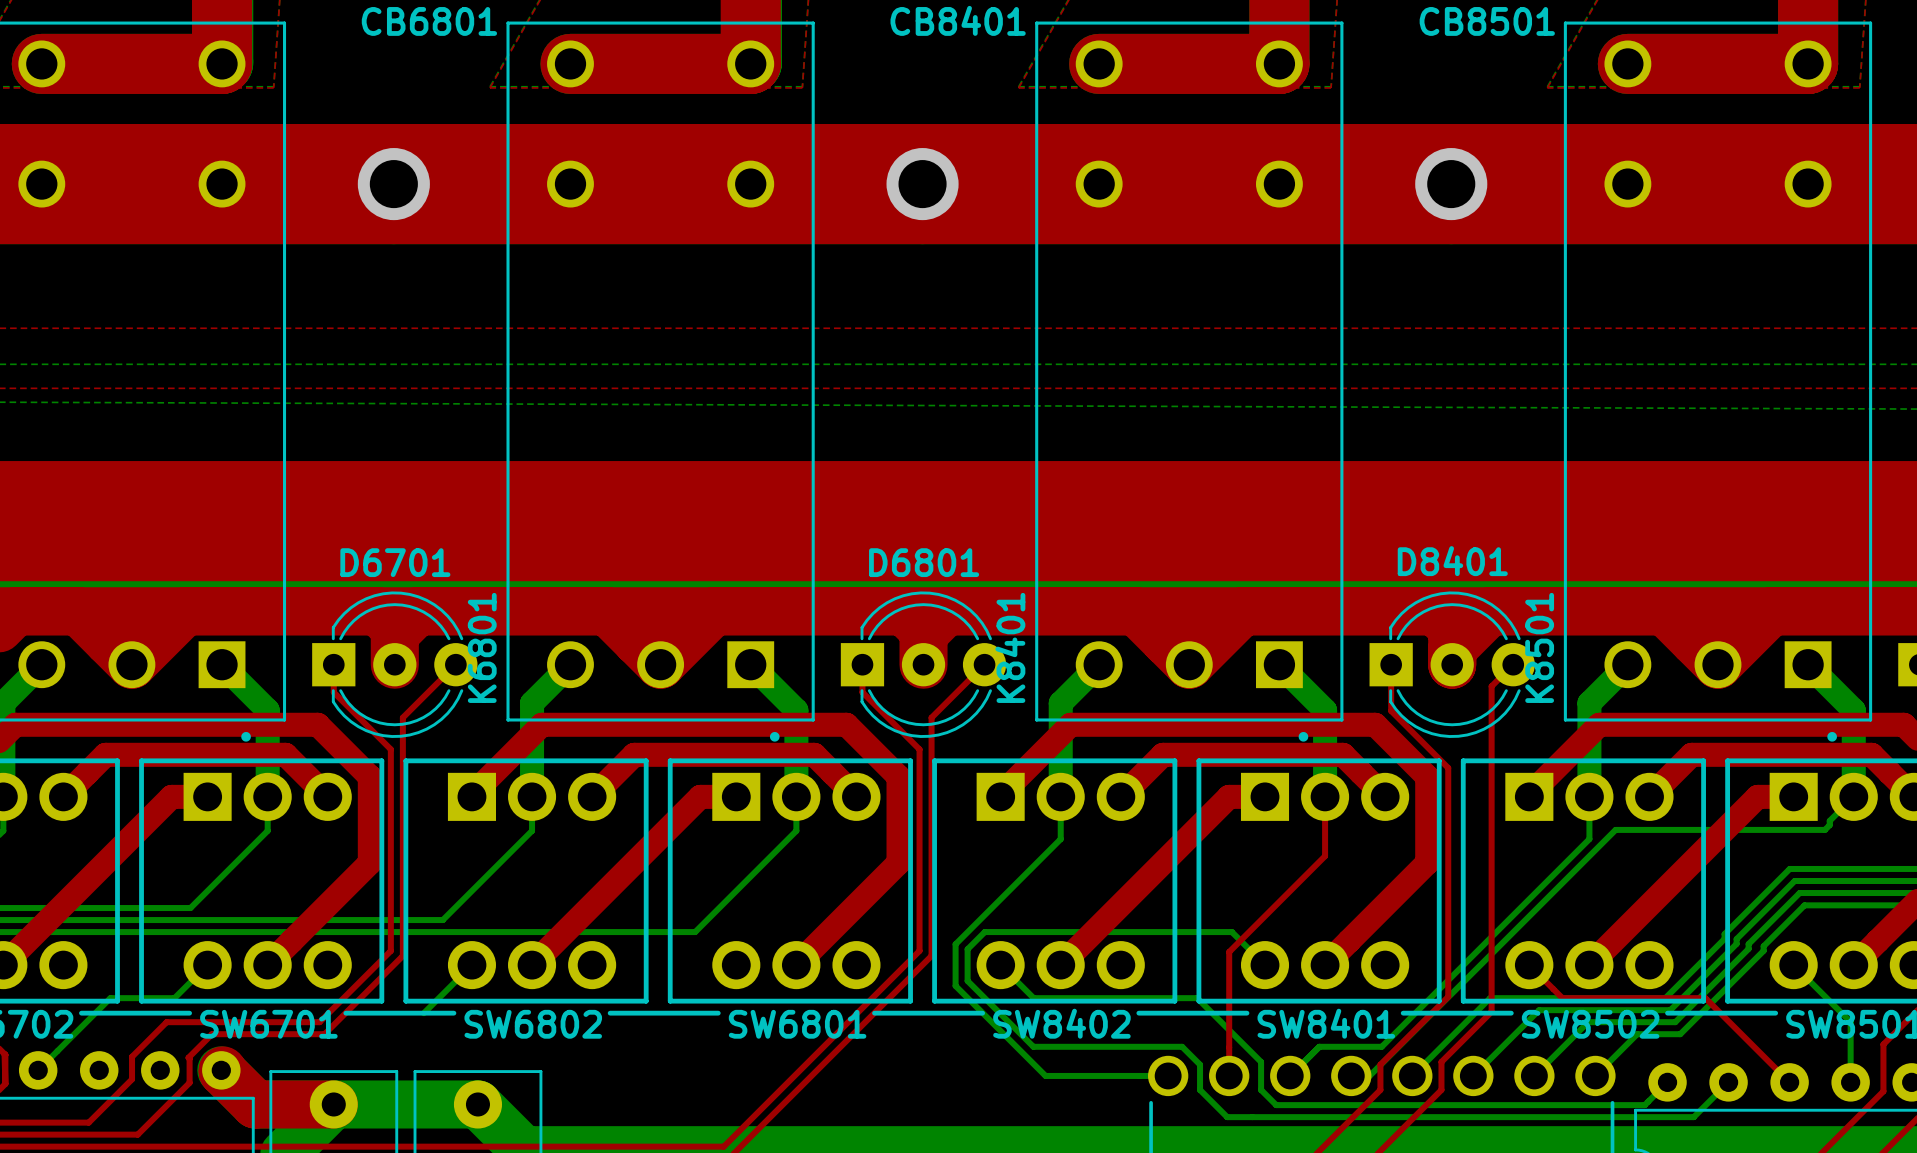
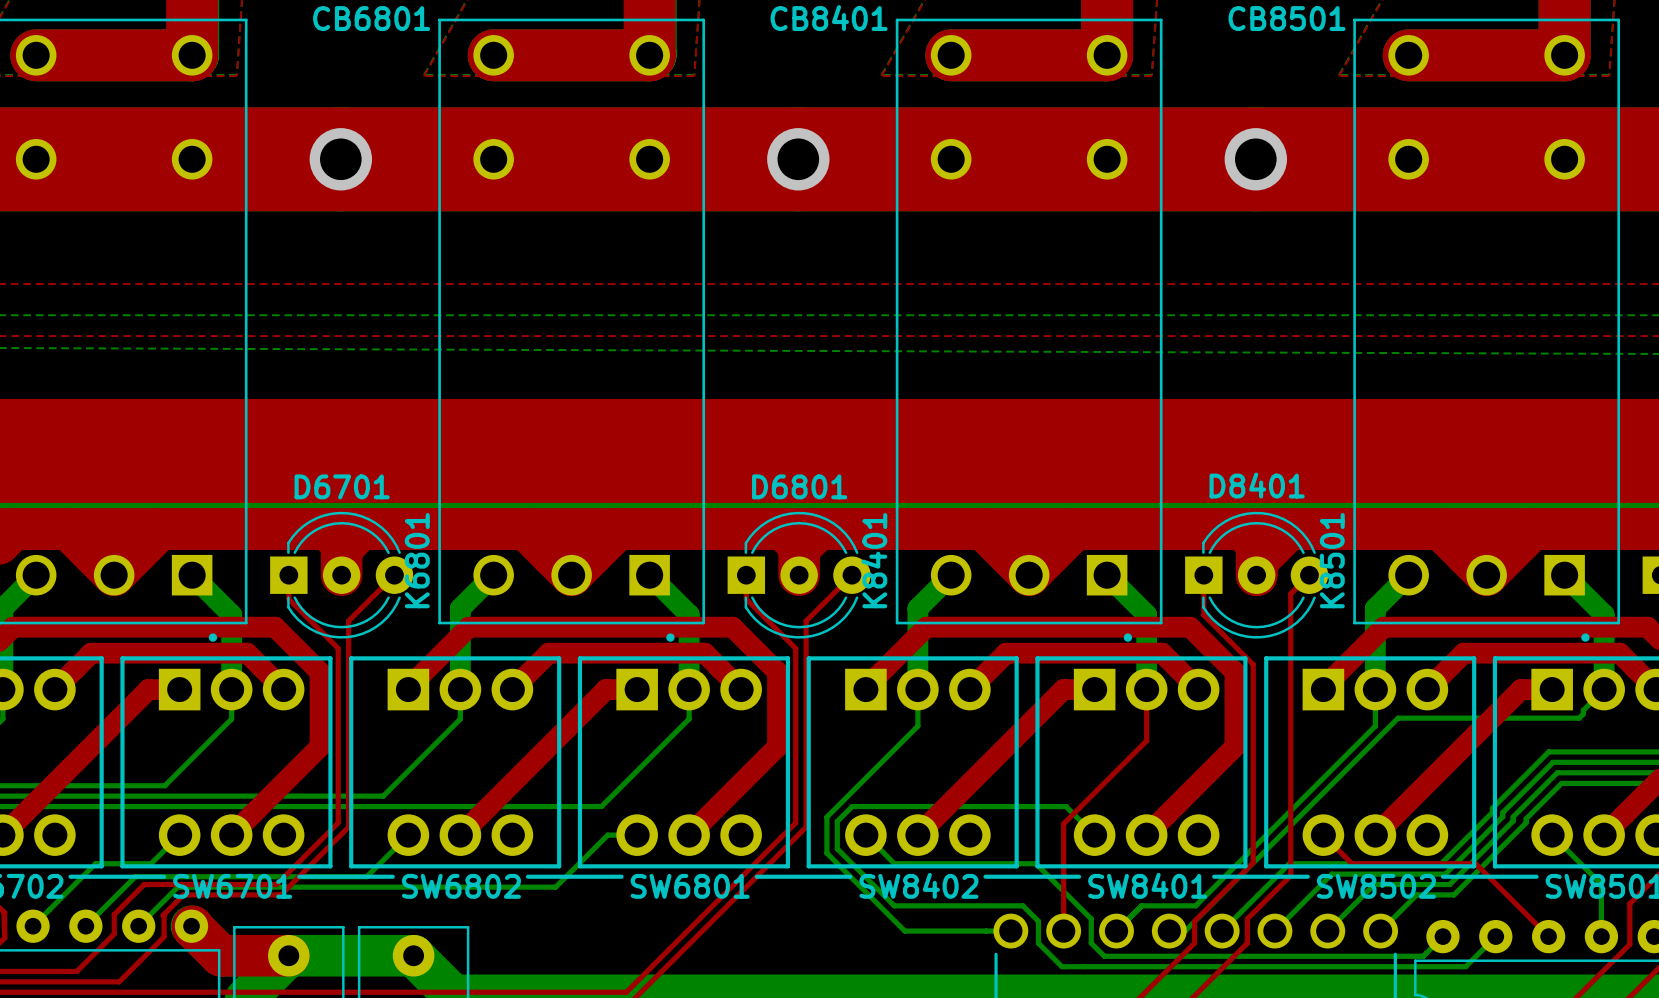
bottom track: none -> (637, 835) (607, 835) (555, 887) (177, 887) (138, 926)
bottom track: none -> (366, 876) (135, 876) (85, 926)

